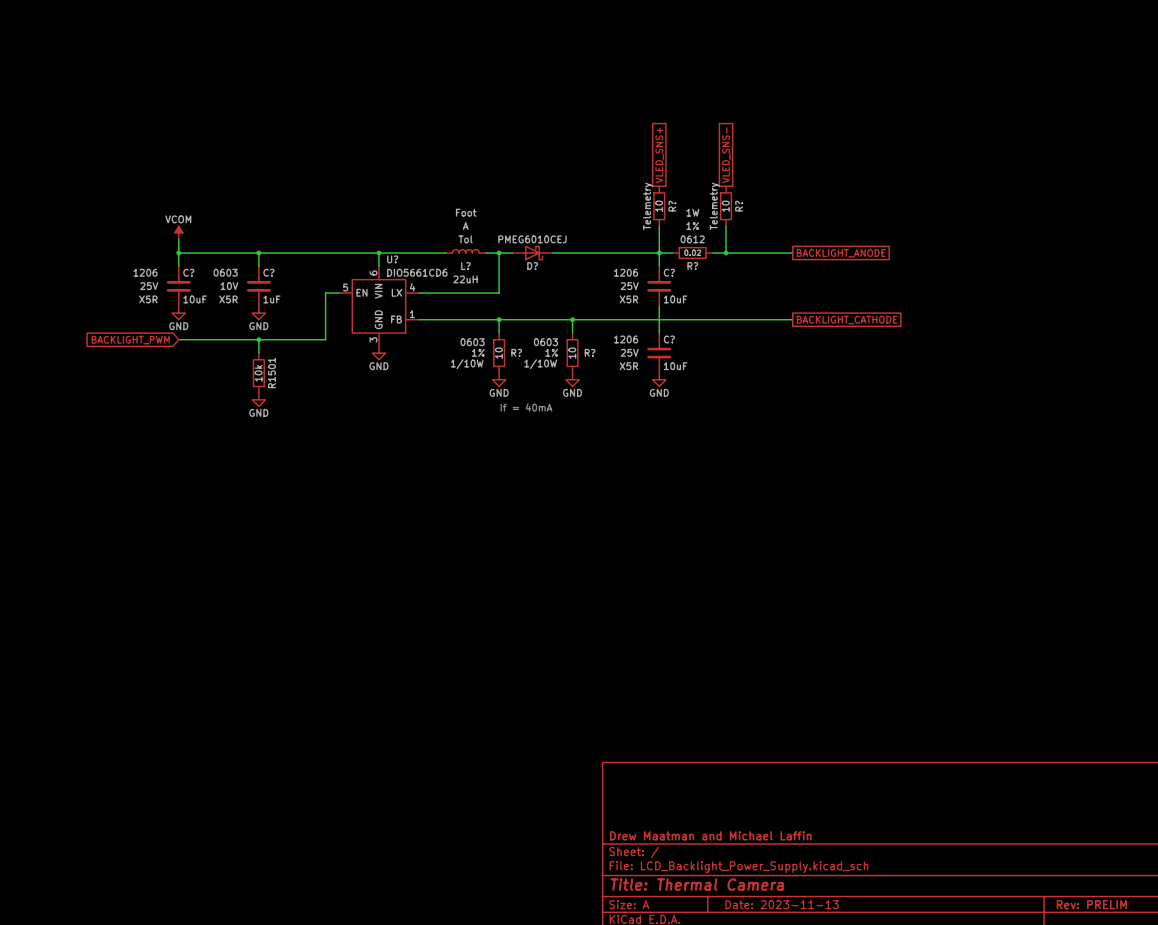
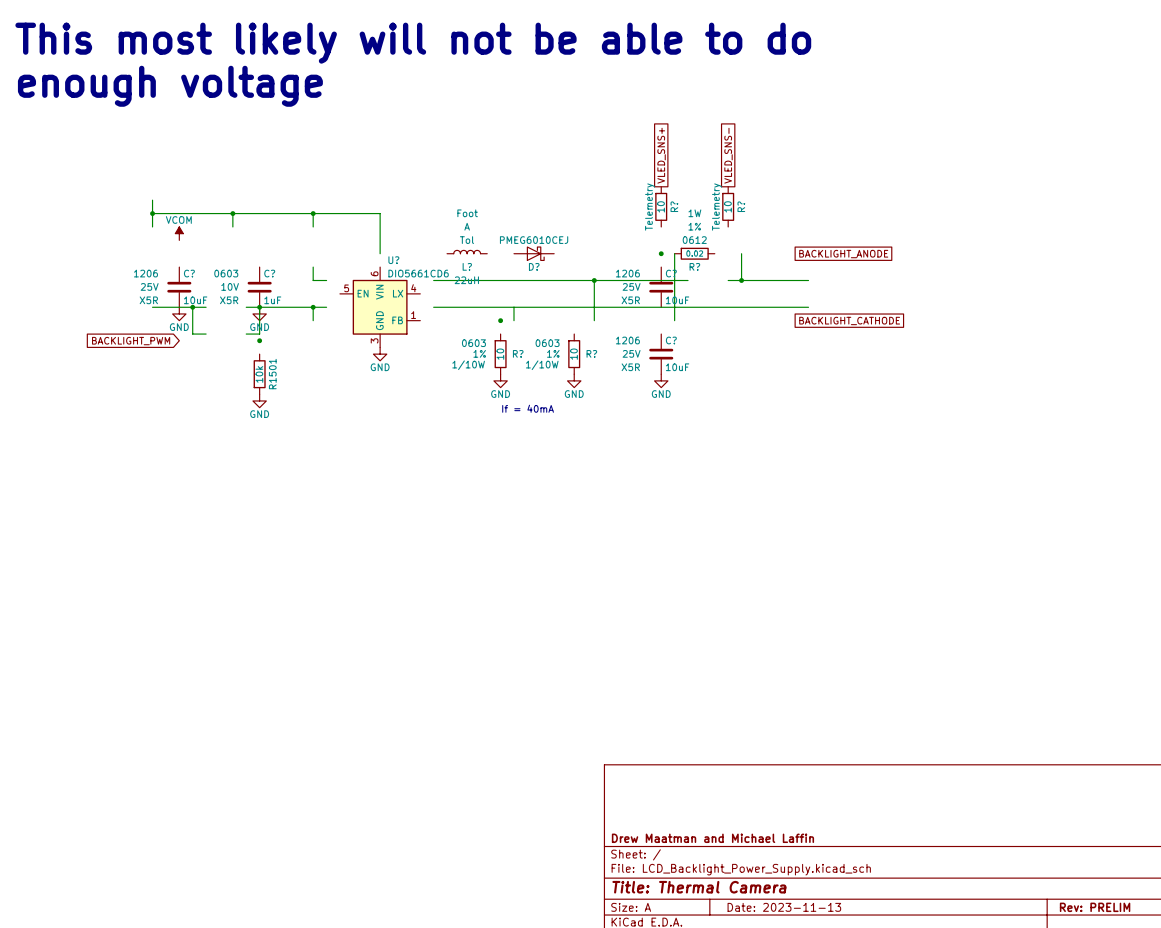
text: none -> This most likely will not be able to do (413, 43)
text: none -> enough voltage (170, 86)
junction: none -> (152, 213)
junction: none -> (232, 213)
wire: none -> (313, 213) (313, 226)
junction: none -> (313, 213)
wire: (659, 226) (659, 266) -> (594, 280) (594, 320)
wire: (726, 226) (726, 252) -> (741, 253) (741, 280)
wire: (178, 239) (178, 266) -> (152, 200) (152, 226)
wire: (178, 252) (445, 252) -> none
junction: (178, 252) -> none
wire: (258, 252) (258, 266) -> (232, 213) (232, 226)
junction: (258, 252) -> none
wire: (379, 252) (379, 266) -> (380, 253) (380, 213) (152, 213)
junction: (379, 252) -> none
wire: (485, 252) (512, 252) -> none
wire: (499, 252) (499, 293) (419, 293) -> none
junction: (499, 252) -> none
wire: (552, 252) (672, 252) -> (674, 320) (674, 253)
wire: (712, 252) (792, 252) -> (728, 280) (808, 280)
junction position: (726, 252) -> (741, 280)
wire: none -> (313, 267) (313, 280) (326, 280)
wire: none -> (433, 280) (688, 280)
junction: none -> (594, 280)
wire: (338, 293) (325, 293) (325, 339) (178, 339) -> none
wire: none -> (152, 307) (206, 307)
wire: none -> (192, 307) (192, 334) (206, 334)
junction: none -> (192, 307)
wire: none -> (246, 307) (326, 307)
wire: none -> (259, 307) (259, 334) (246, 334)
junction: none -> (259, 307)
junction: none -> (313, 307)
wire: (659, 306) (659, 333) -> none
wire: (419, 319) (792, 319) -> (433, 307) (808, 307)
wire: (499, 319) (499, 333) -> (513, 307) (513, 320)
wire: (572, 319) (572, 333) -> none
junction: (572, 319) -> none
wire: (258, 339) (258, 353) -> (313, 307) (313, 320)

